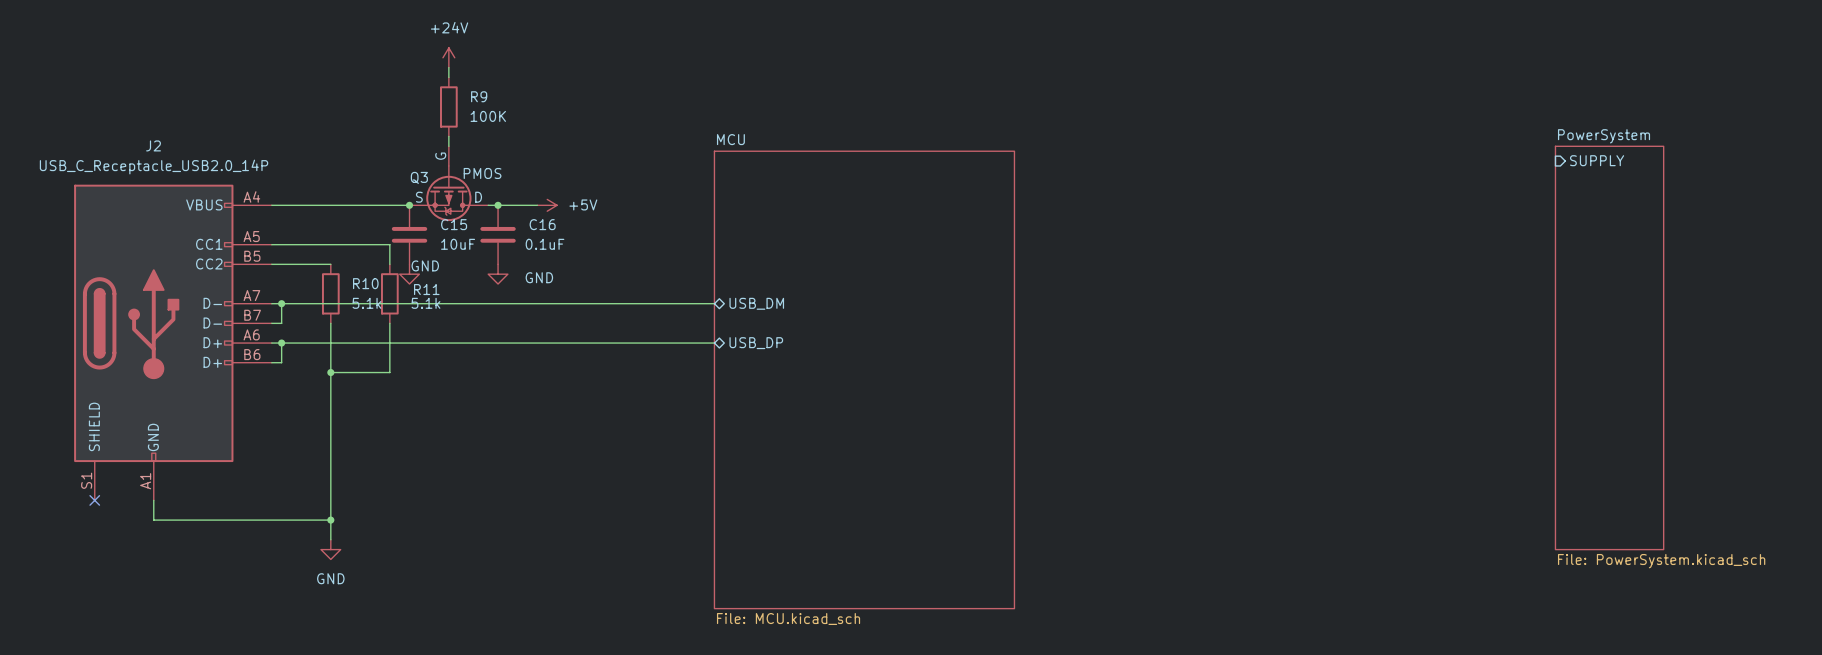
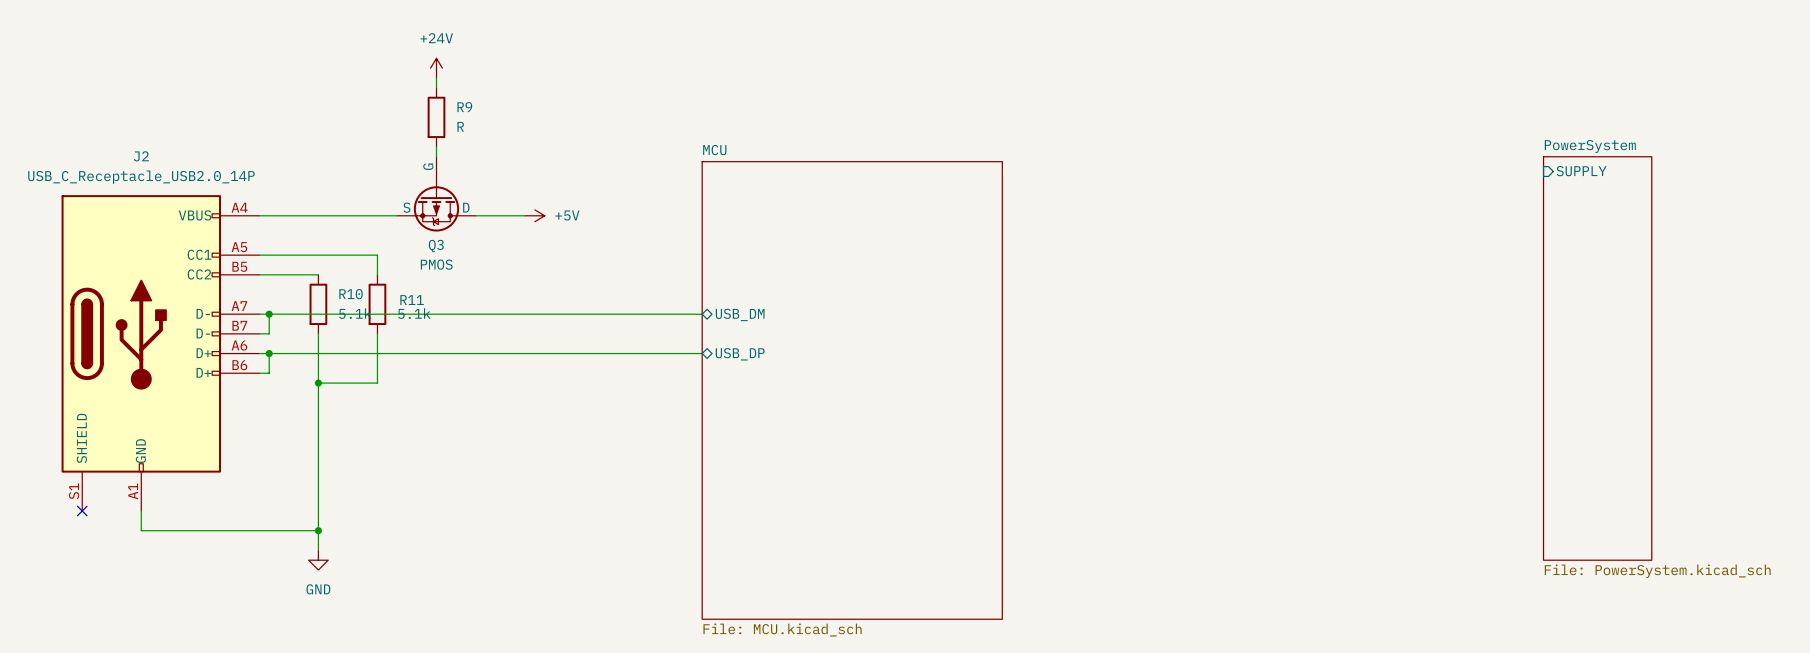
R9 value: 100K (488, 116) -> R (460, 126)
Q3 value position: PMOS (482, 173) -> PMOS (436, 264)
Q3 name position: Q3 (419, 177) -> Q3 (436, 246)
junction: (409, 205) -> none
junction: (498, 205) -> none
C15: 10uF (409, 234) -> none
C16: 0.1uF (498, 234) -> none
power symbol: GND (409, 274) -> none
power symbol: GND (498, 274) -> none

